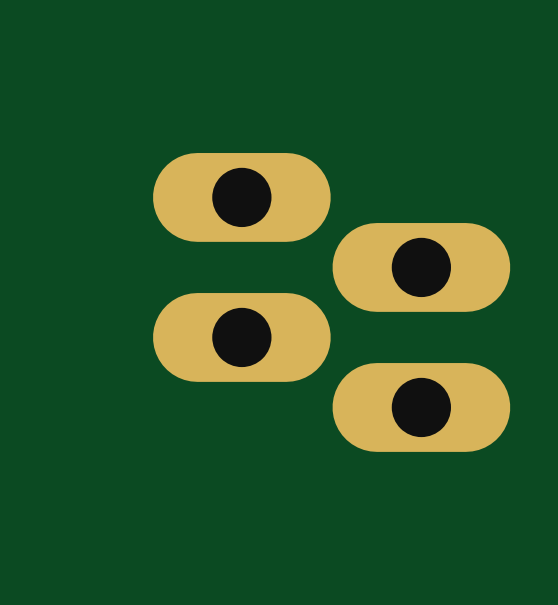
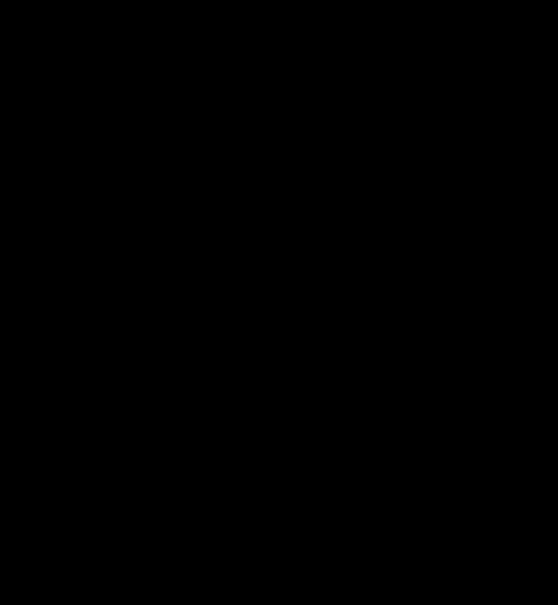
part: (241, 267) -> none
part: (421, 337) -> none

